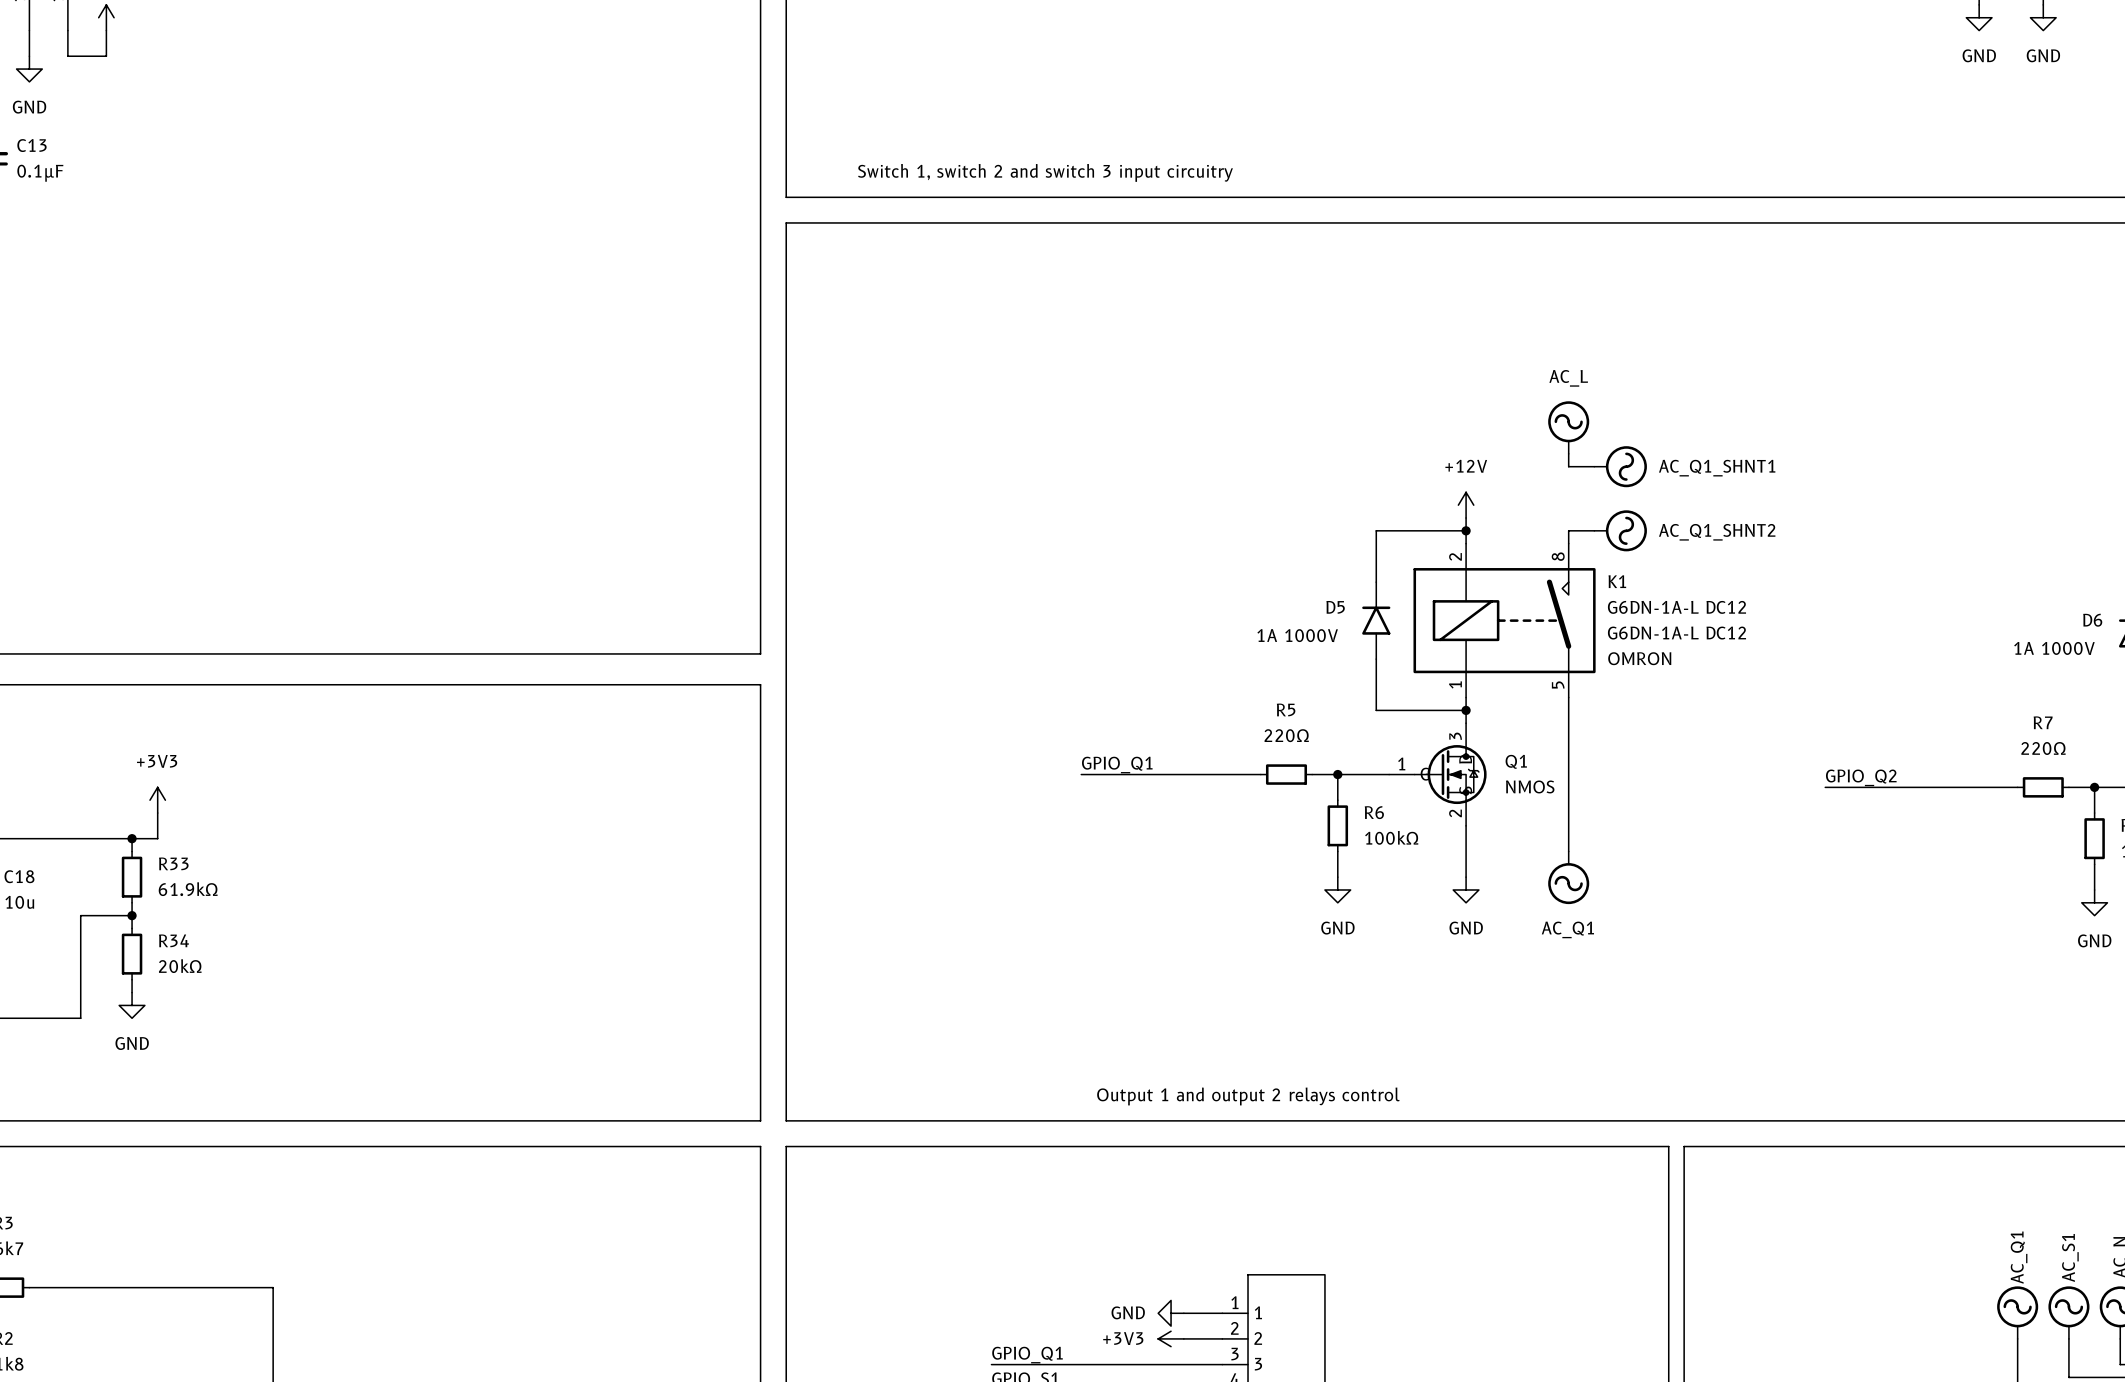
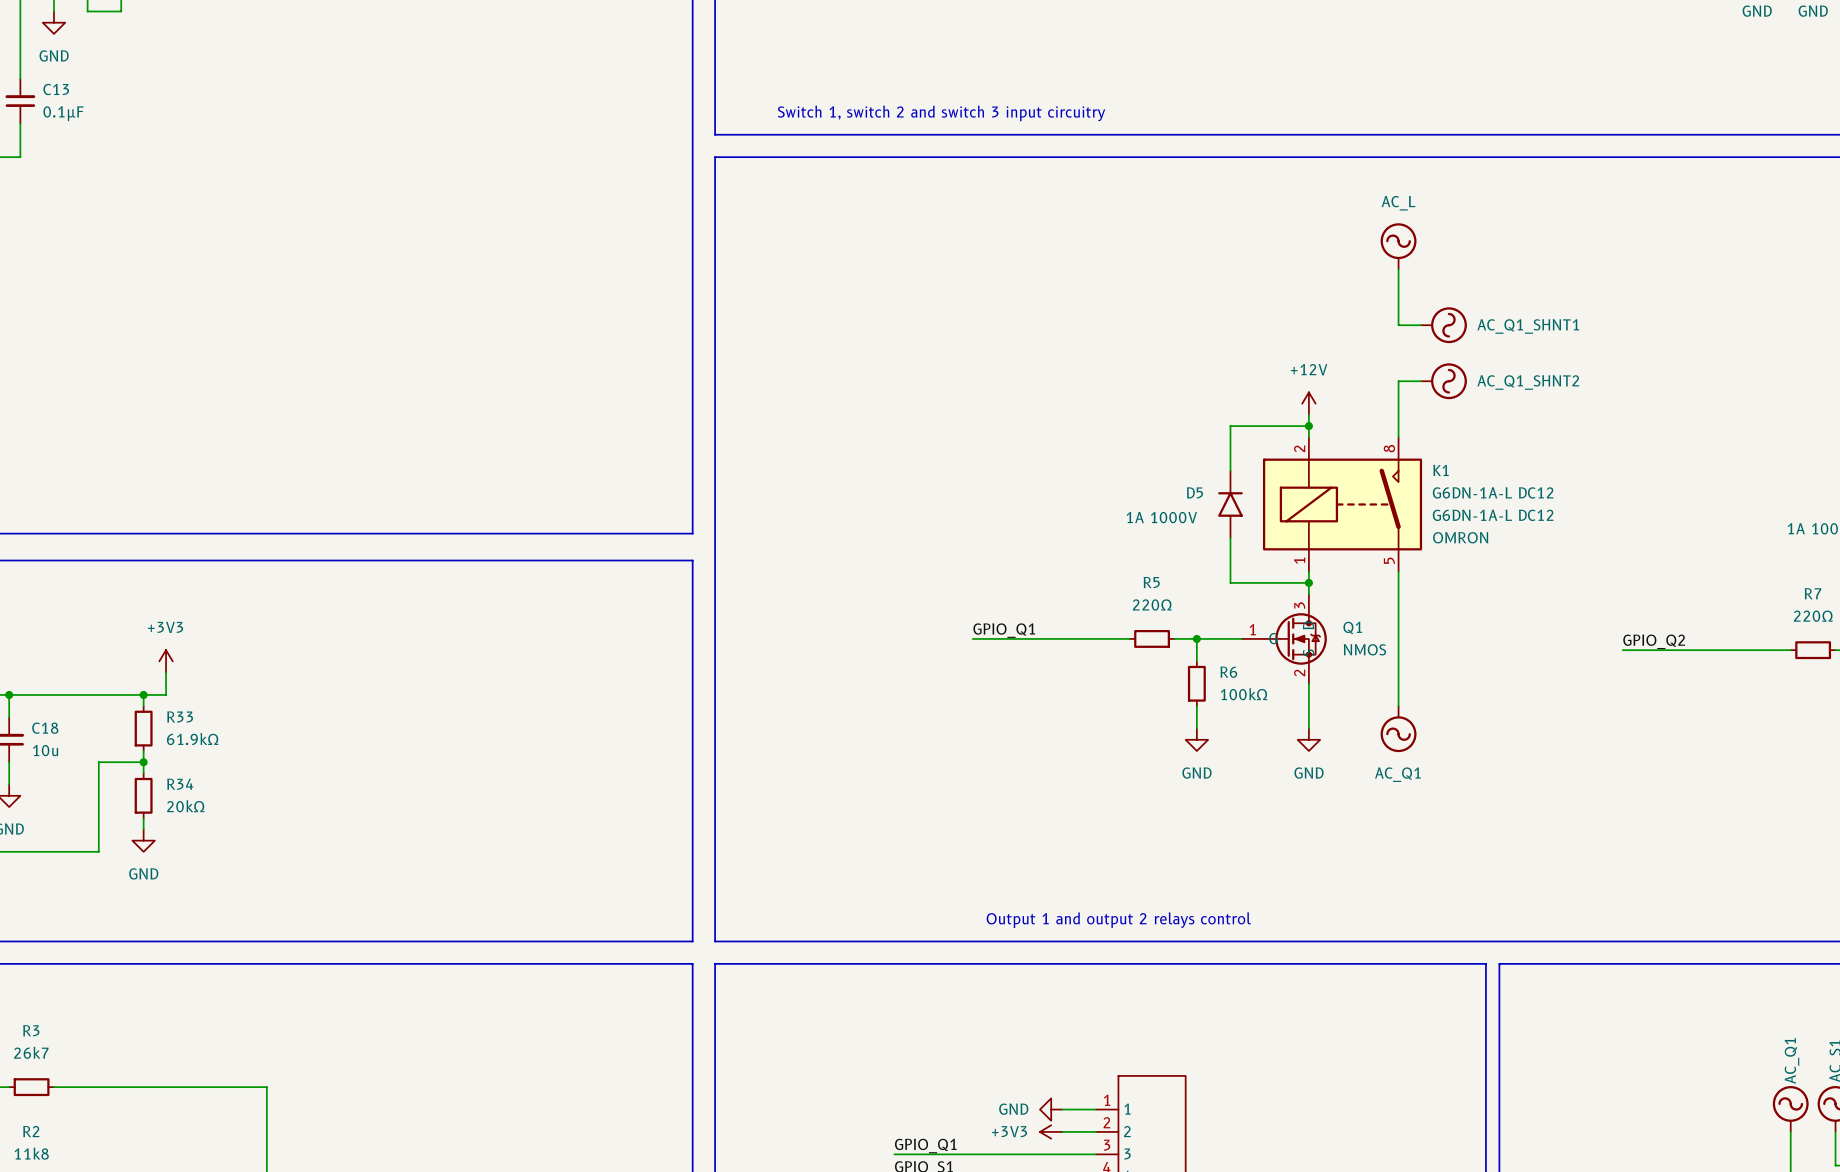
wire: none -> (1398, 269) (1398, 325) (1420, 325)
power symbol position: AC_L (1568, 427) -> AC_L (1398, 246)
wire: (1568, 453) (1568, 466) (1594, 466) -> none
power symbol position: AC_Q1_SHNT1 (1620, 466) -> AC_Q1_SHNT1 (1443, 325)
wire: (1568, 530) (1594, 530) -> (1398, 426) (1398, 381) (1420, 381)
power symbol position: AC_Q1_SHNT2 (1620, 530) -> AC_Q1_SHNT2 (1443, 381)

